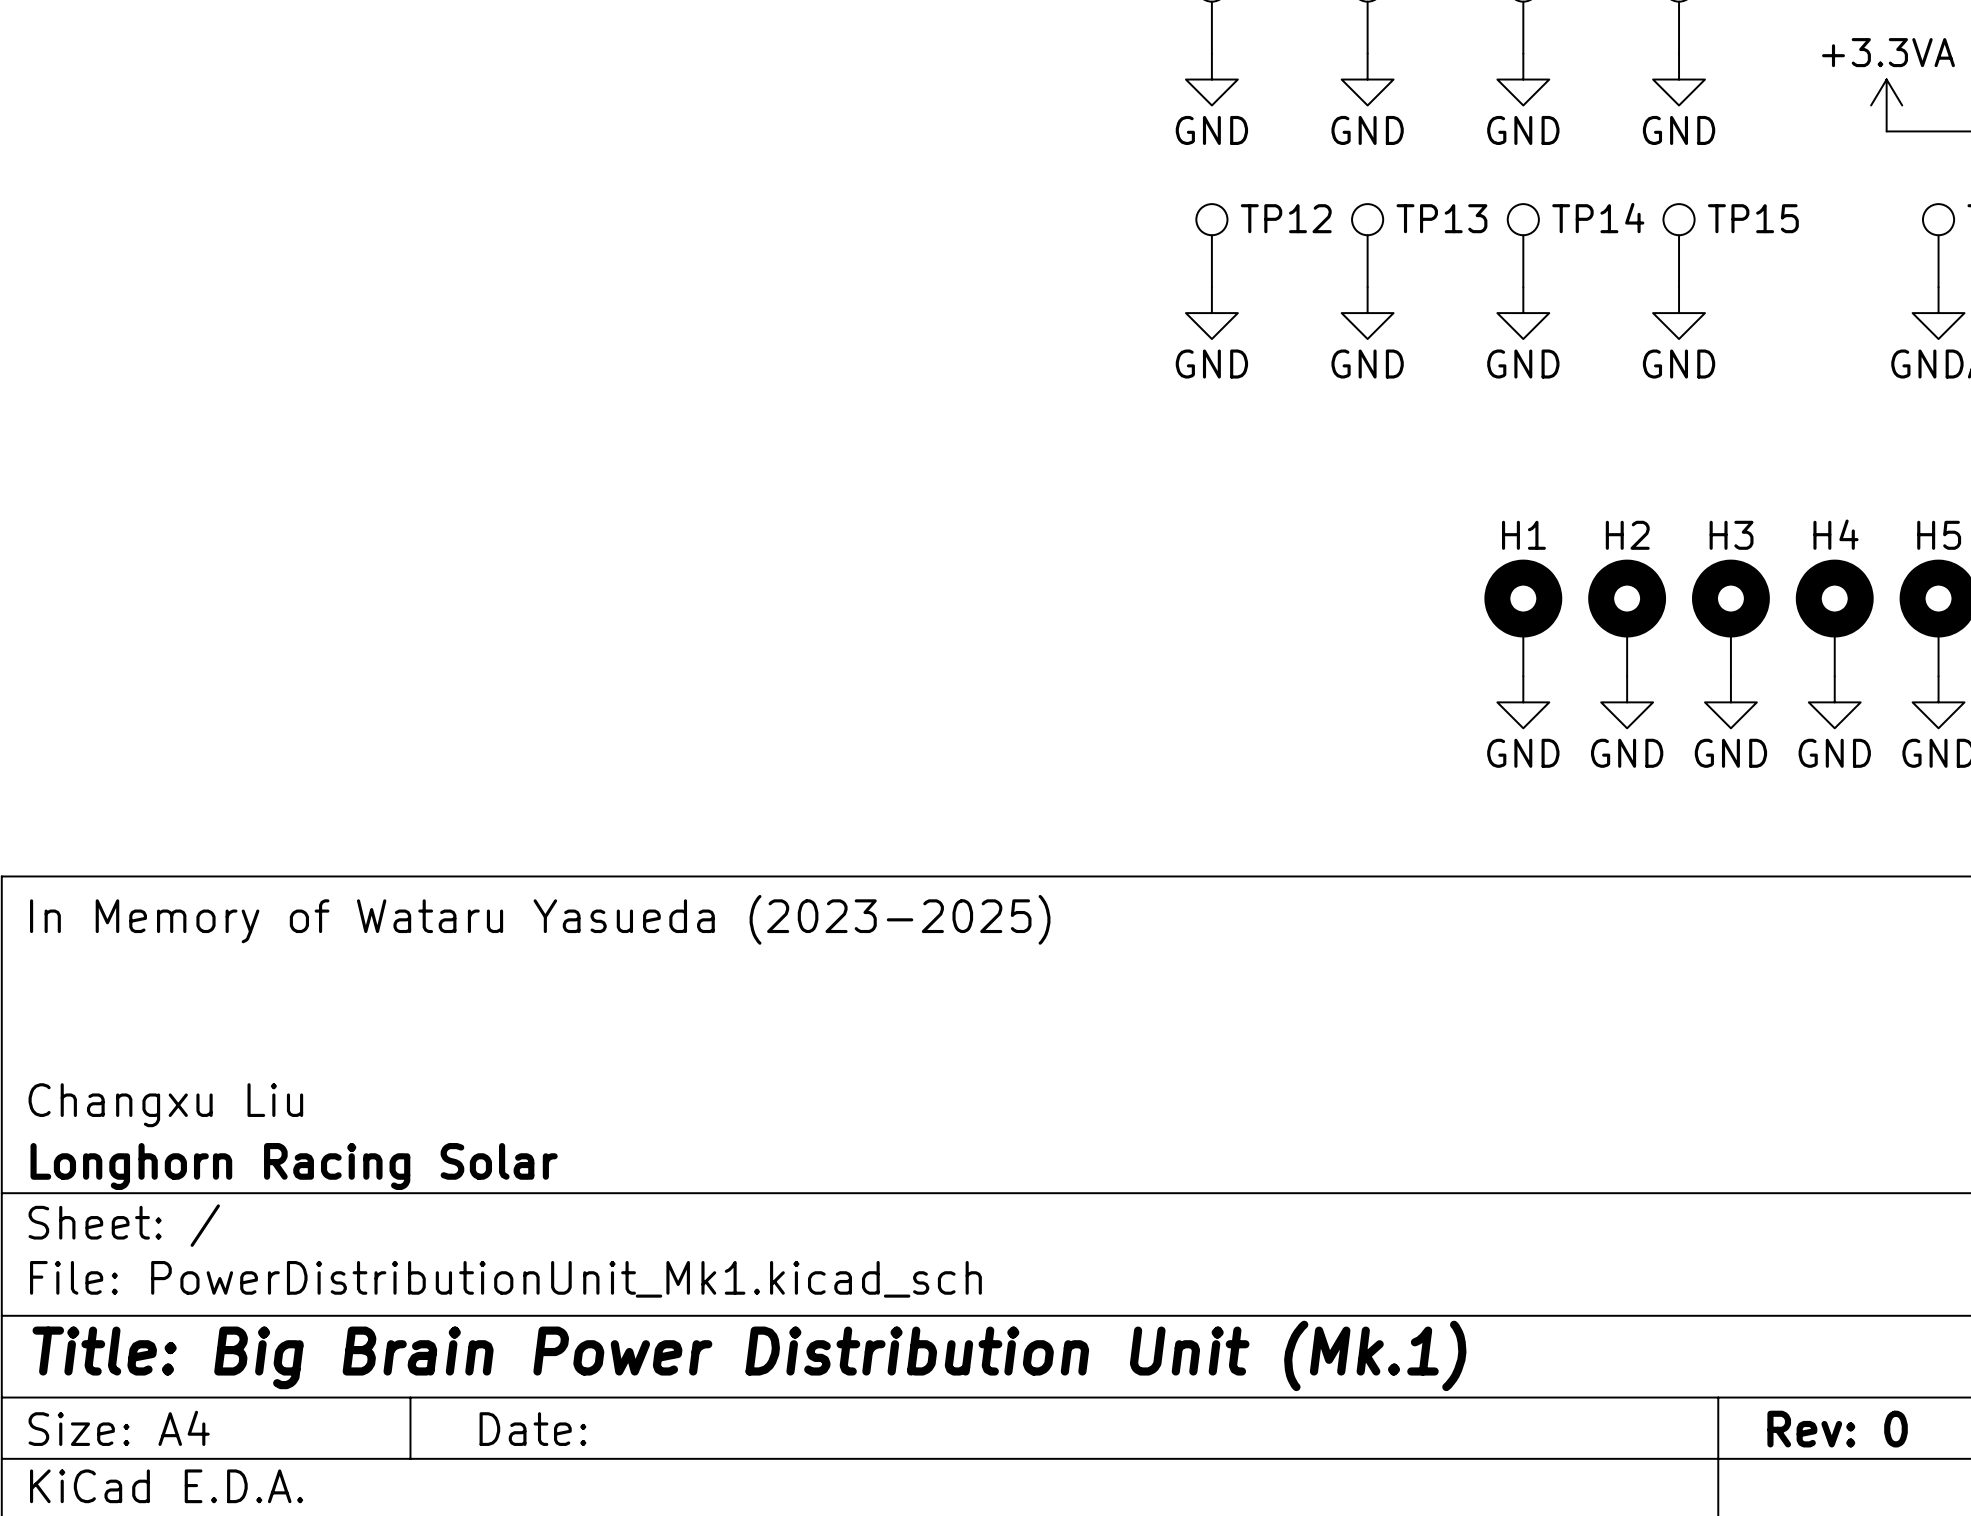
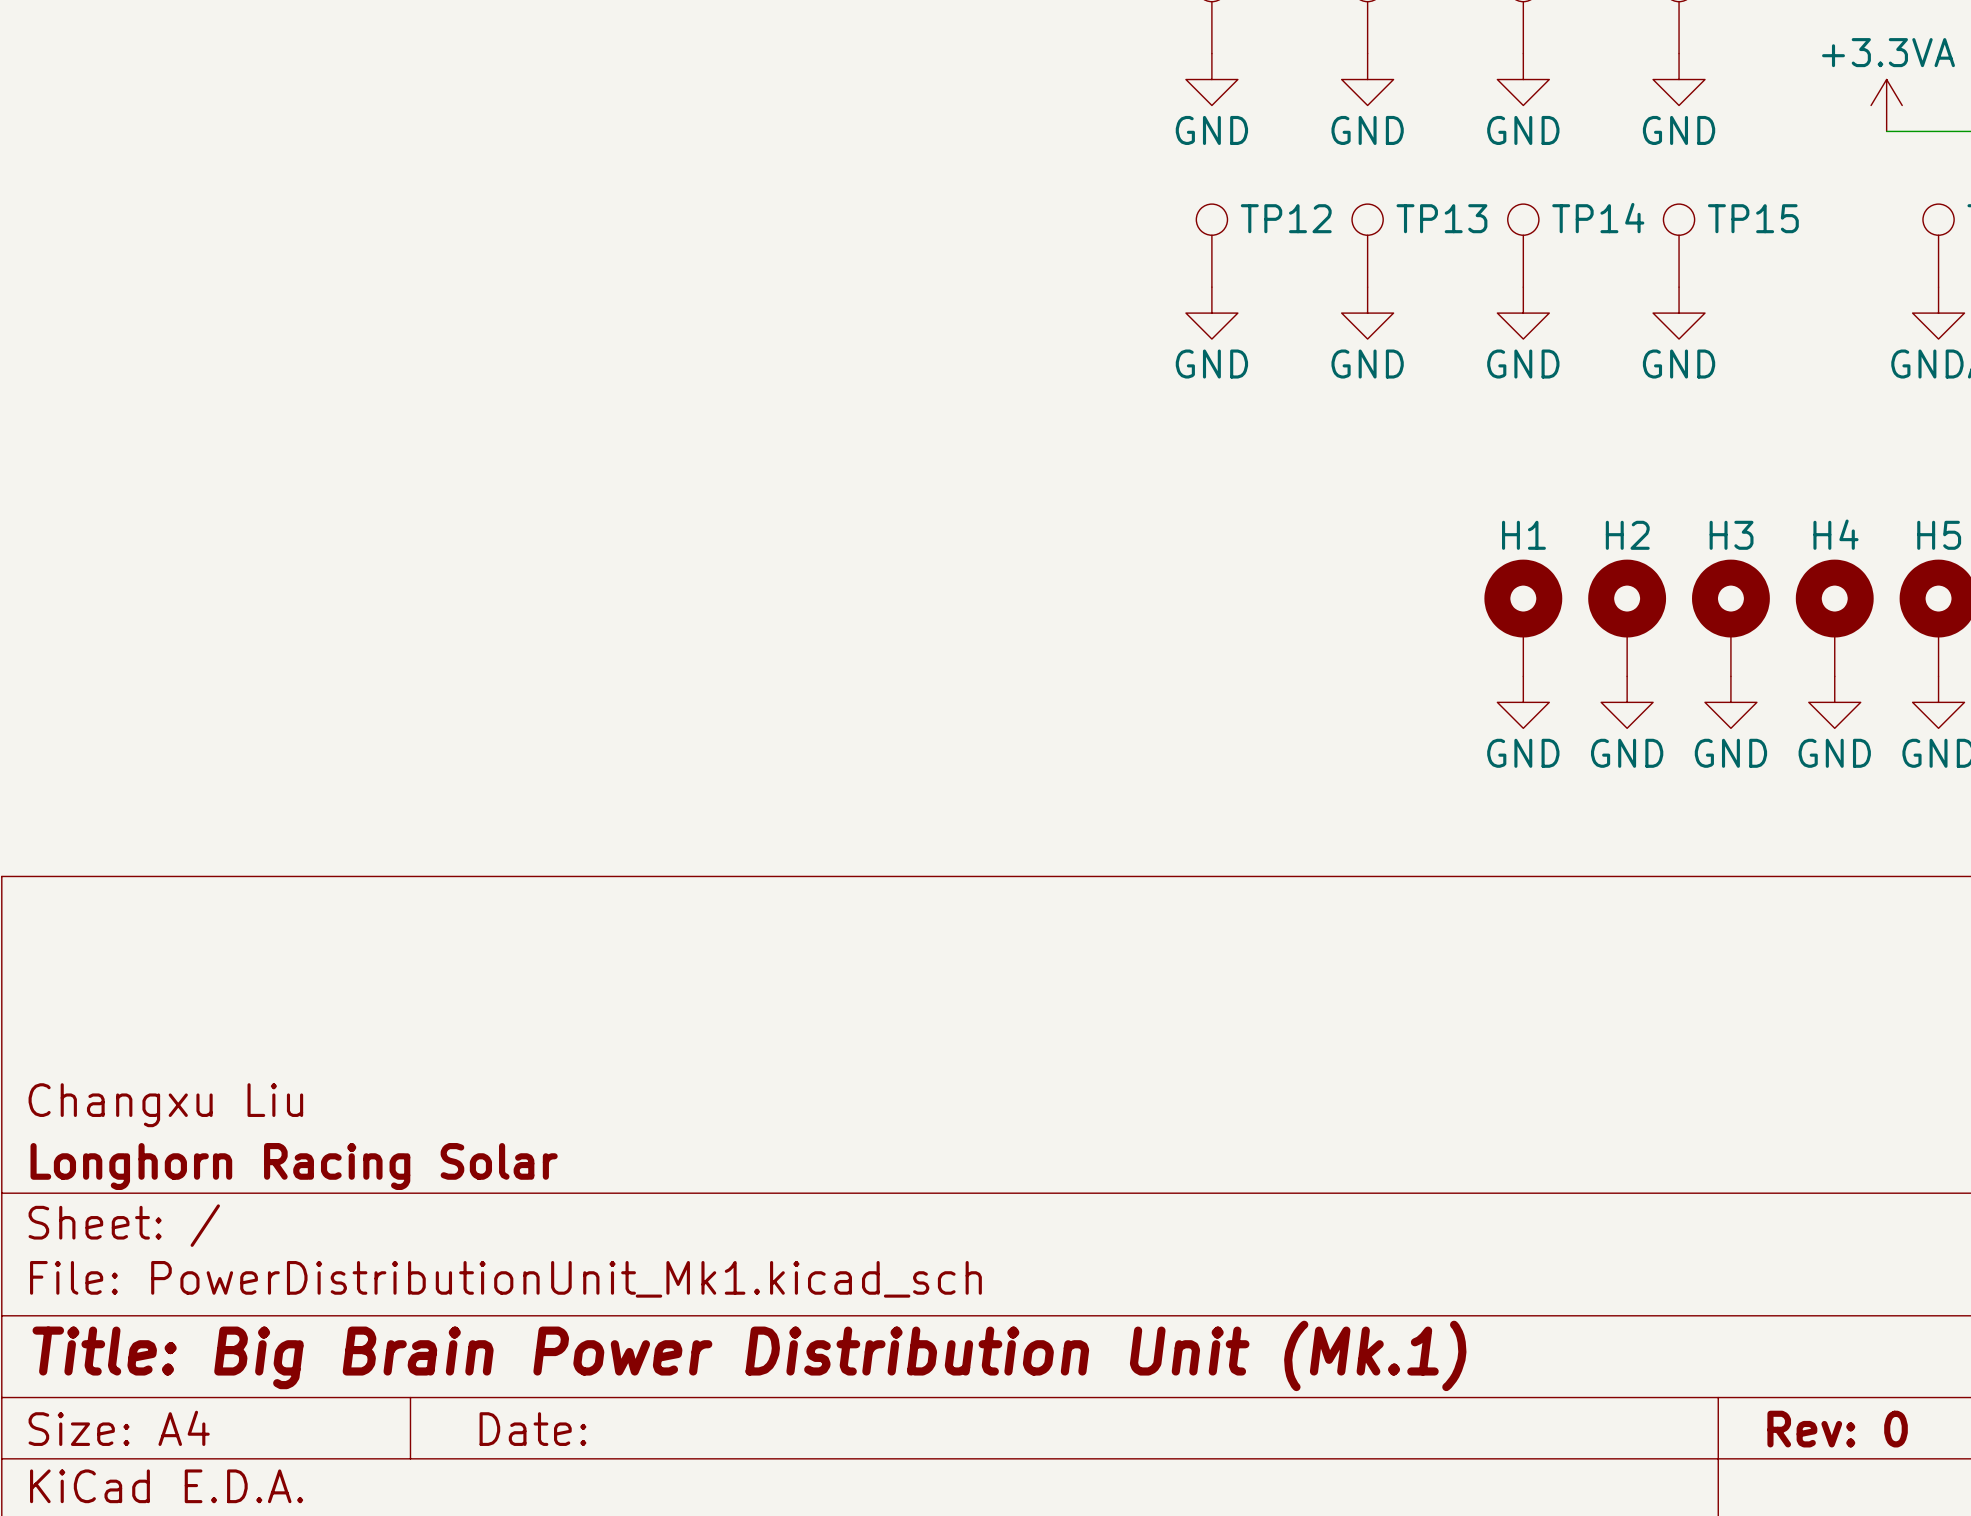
title block: In Memory of Wataru Yasueda (2023-2025) (540, 919) -> none

